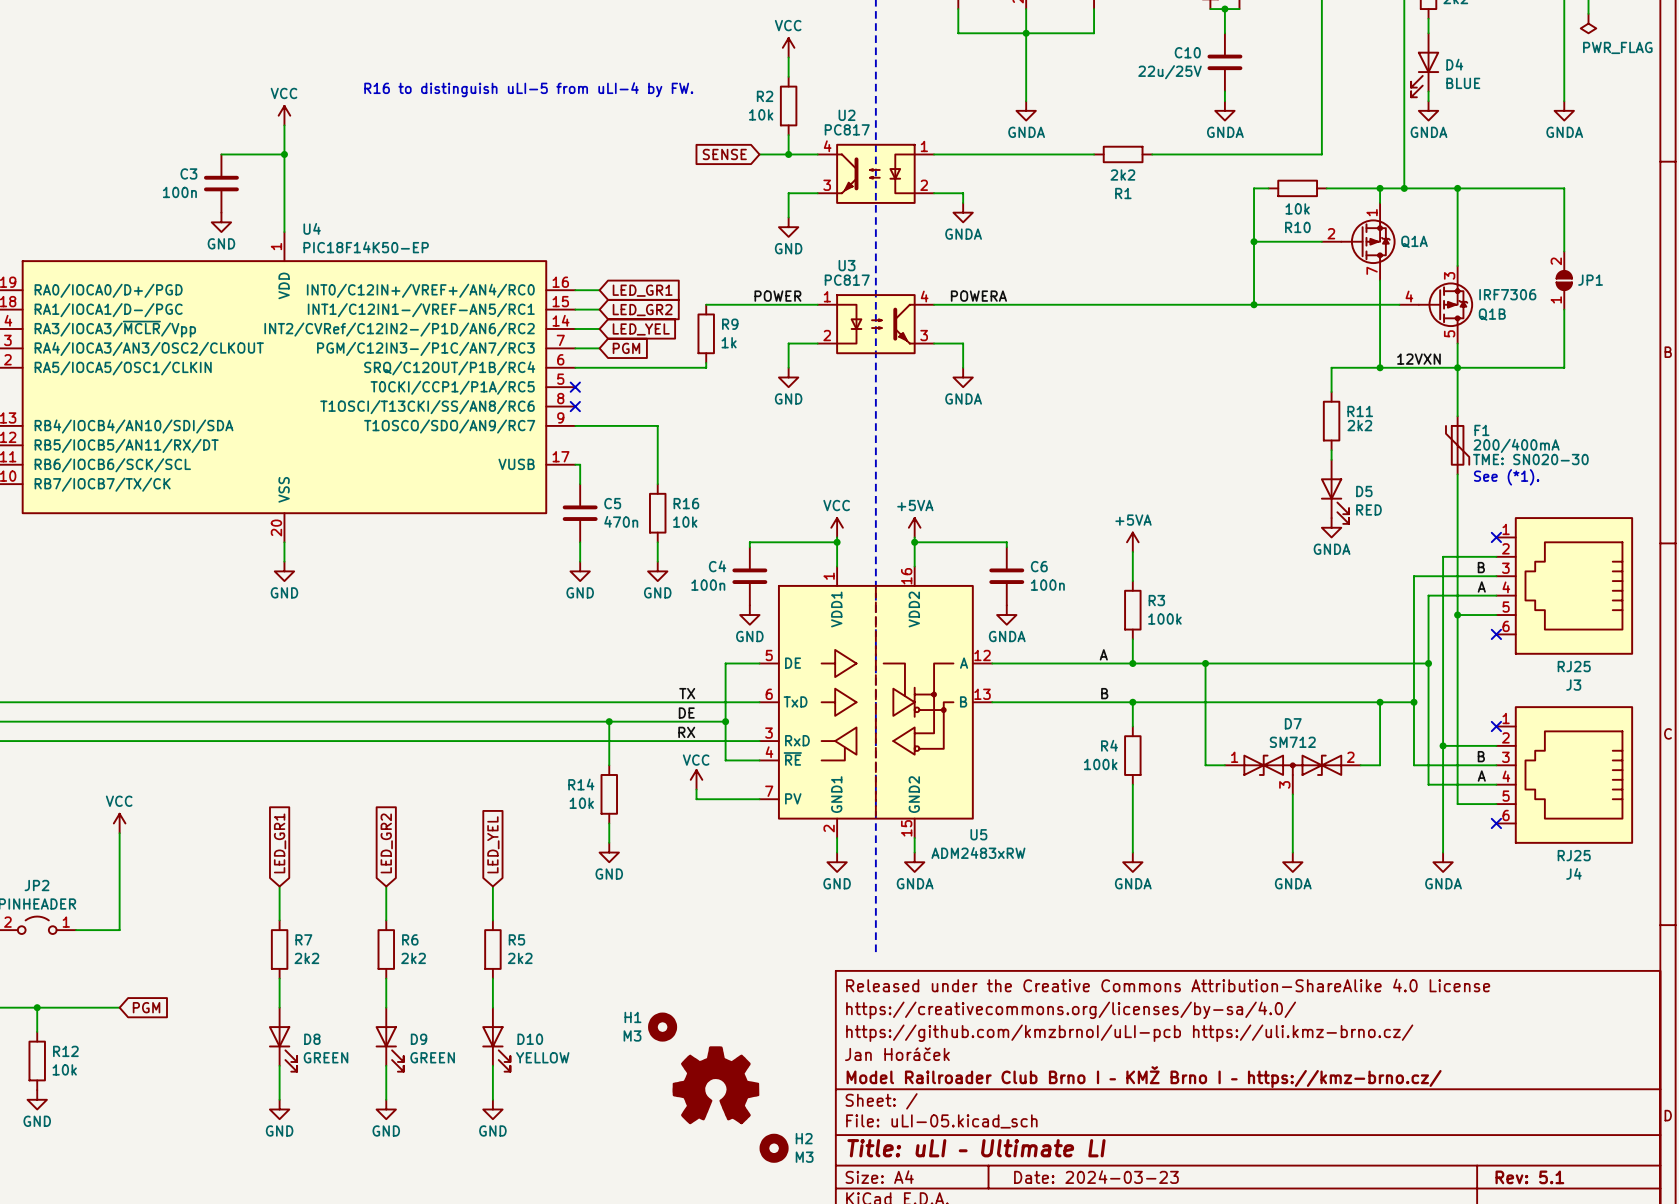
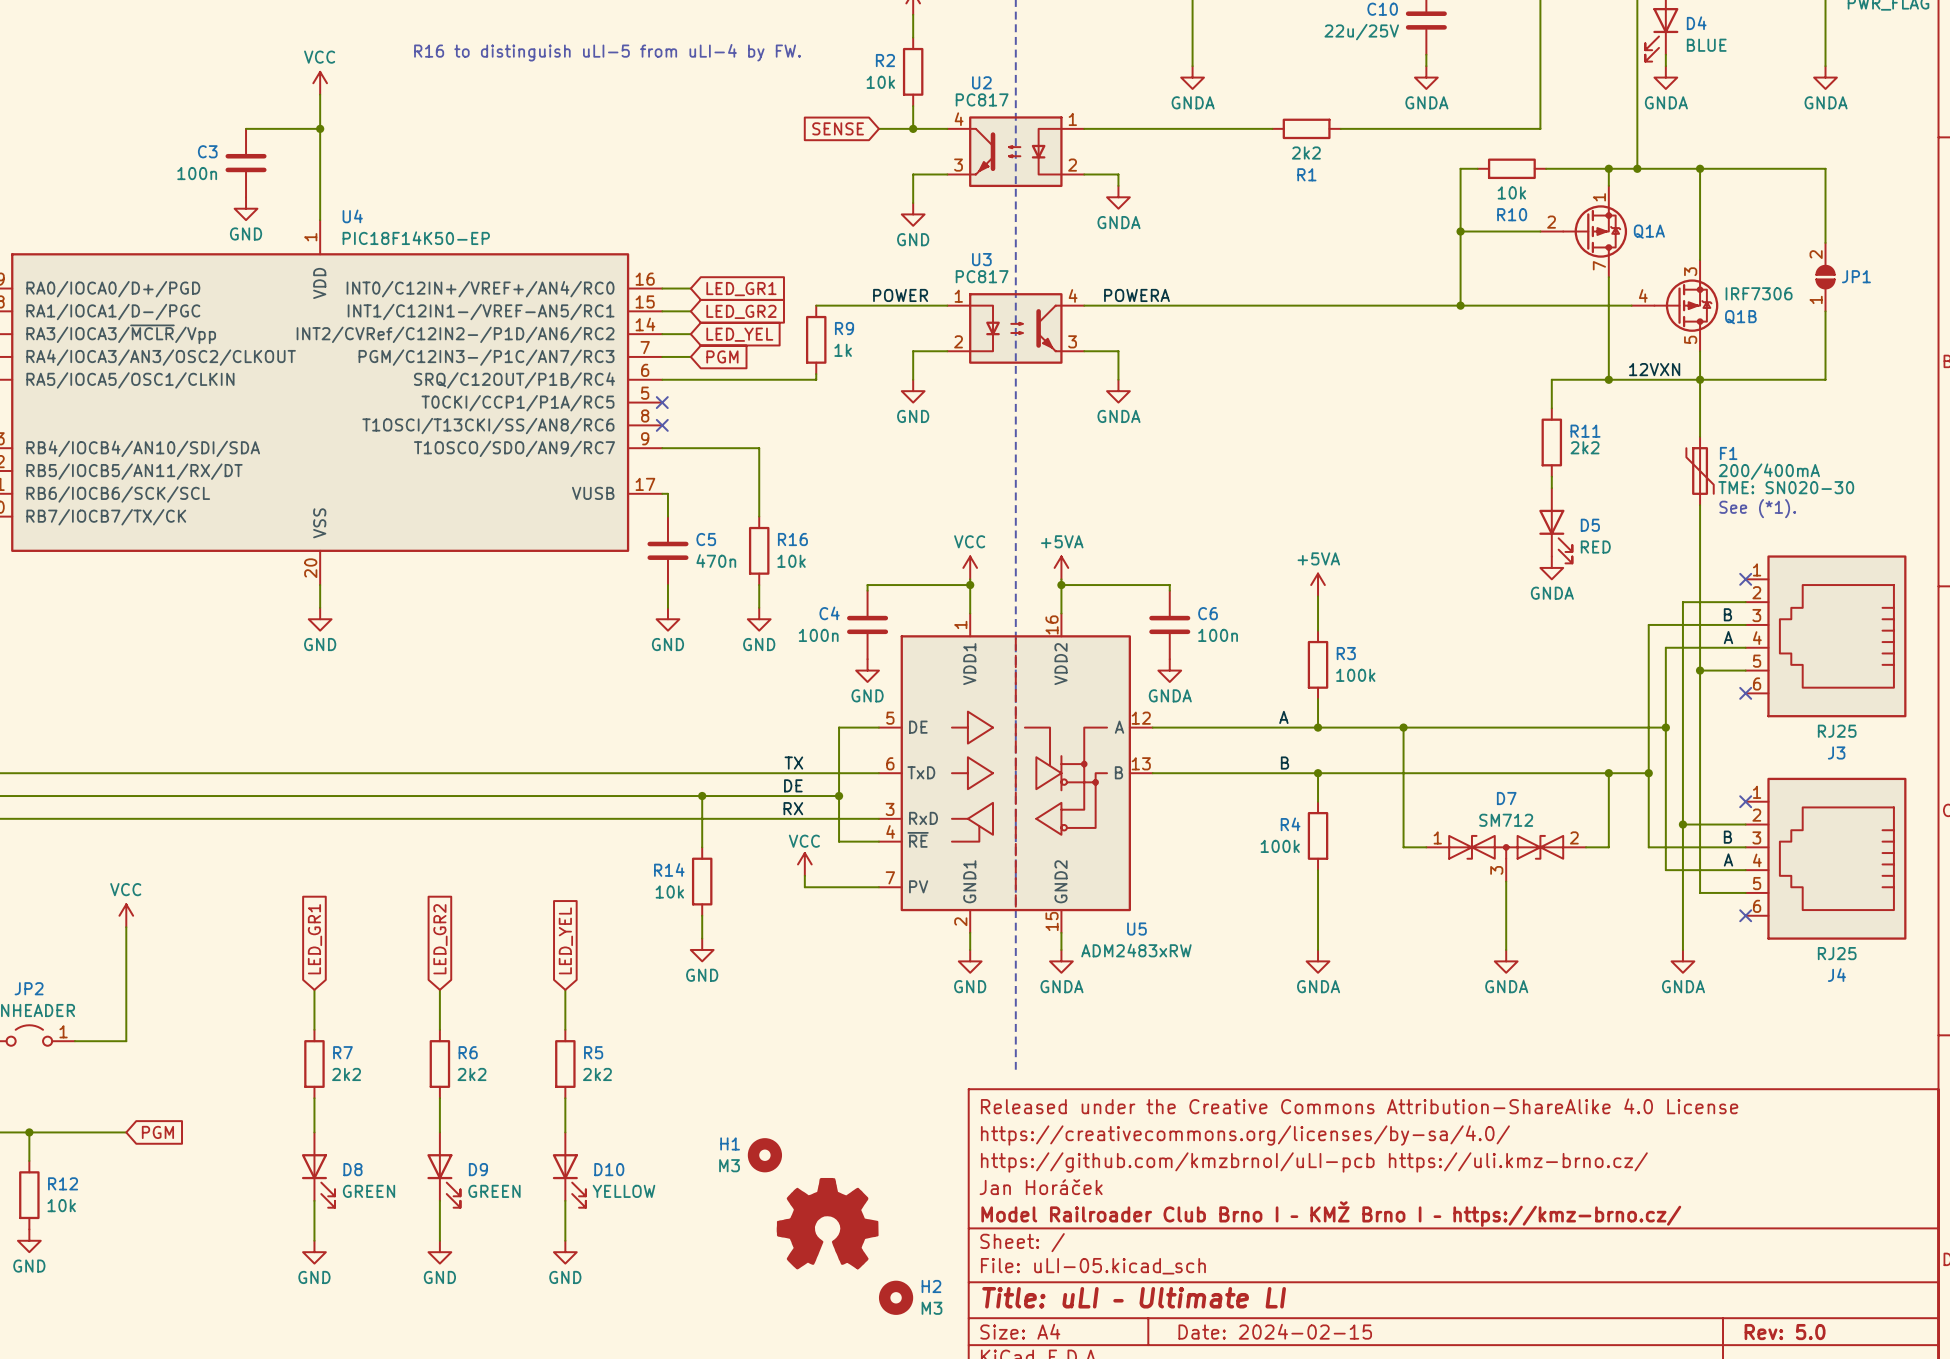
title block: Date: 2024-03-23 (1096, 1177) -> Date: 2024-02-15 (1275, 1331)
title block: Rev: 5.1 (1529, 1177) -> Rev: 5.0 (1785, 1332)

